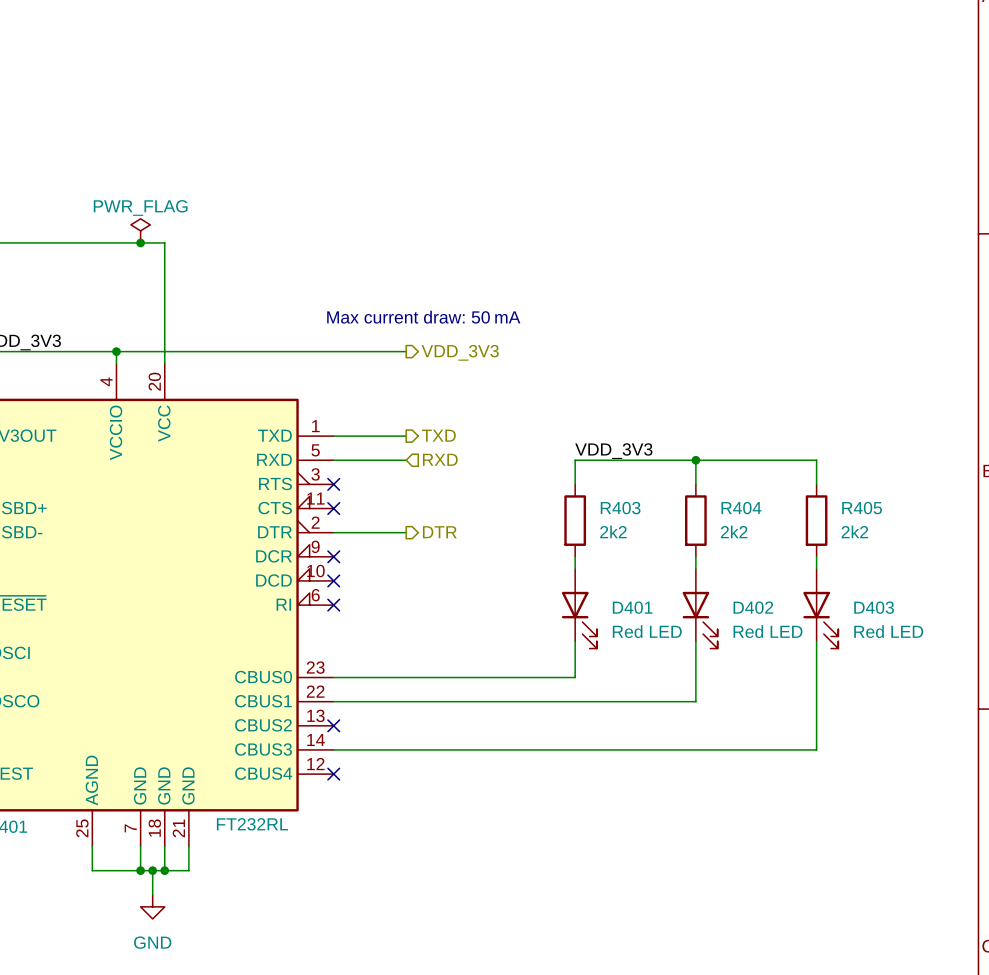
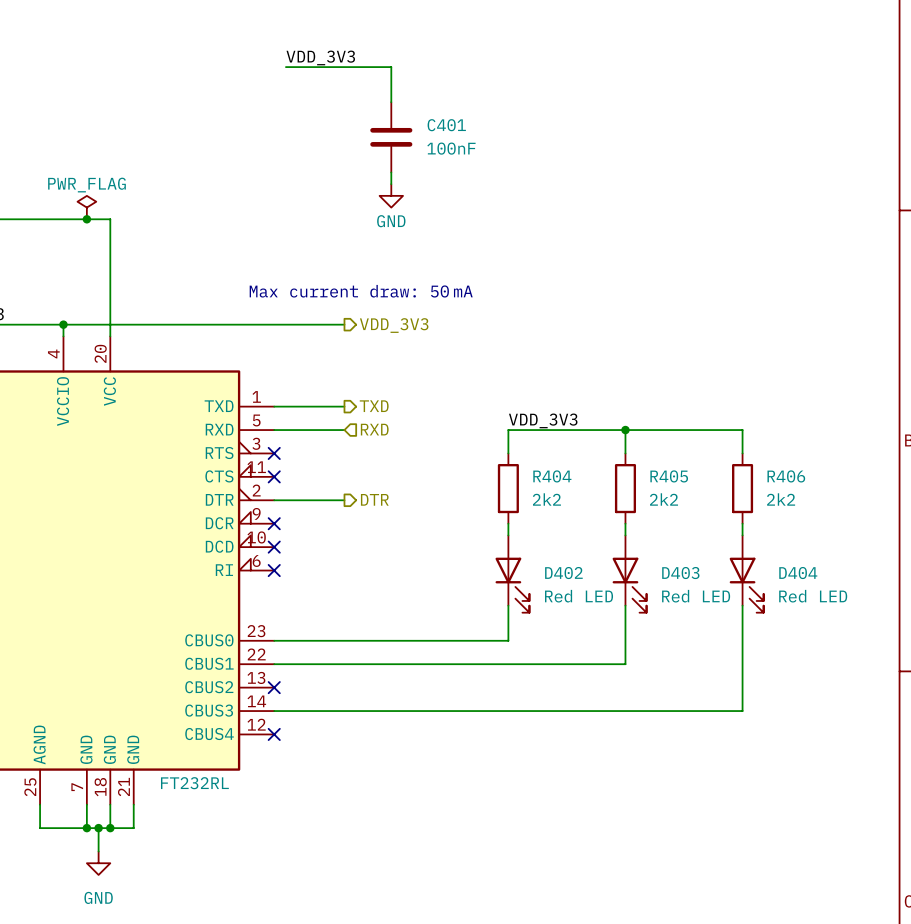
label: none -> VDD_3V3 (320, 57)
wire: none -> (285, 67) (391, 67) (391, 102)
C401: none -> 100nF (391, 137)
wire: none -> (391, 172) (391, 184)
power symbol: none -> GND (391, 195)
R403 name: R403 (620, 508) -> R404 (552, 476)
R404 name: R404 (741, 508) -> R405 (669, 476)
R405 name: R405 (862, 508) -> R406 (786, 476)
D401 name: D401 (632, 607) -> D402 (563, 573)
D402 name: D402 (753, 607) -> D403 (680, 573)
D403 name: D403 (874, 607) -> D404 (798, 573)

